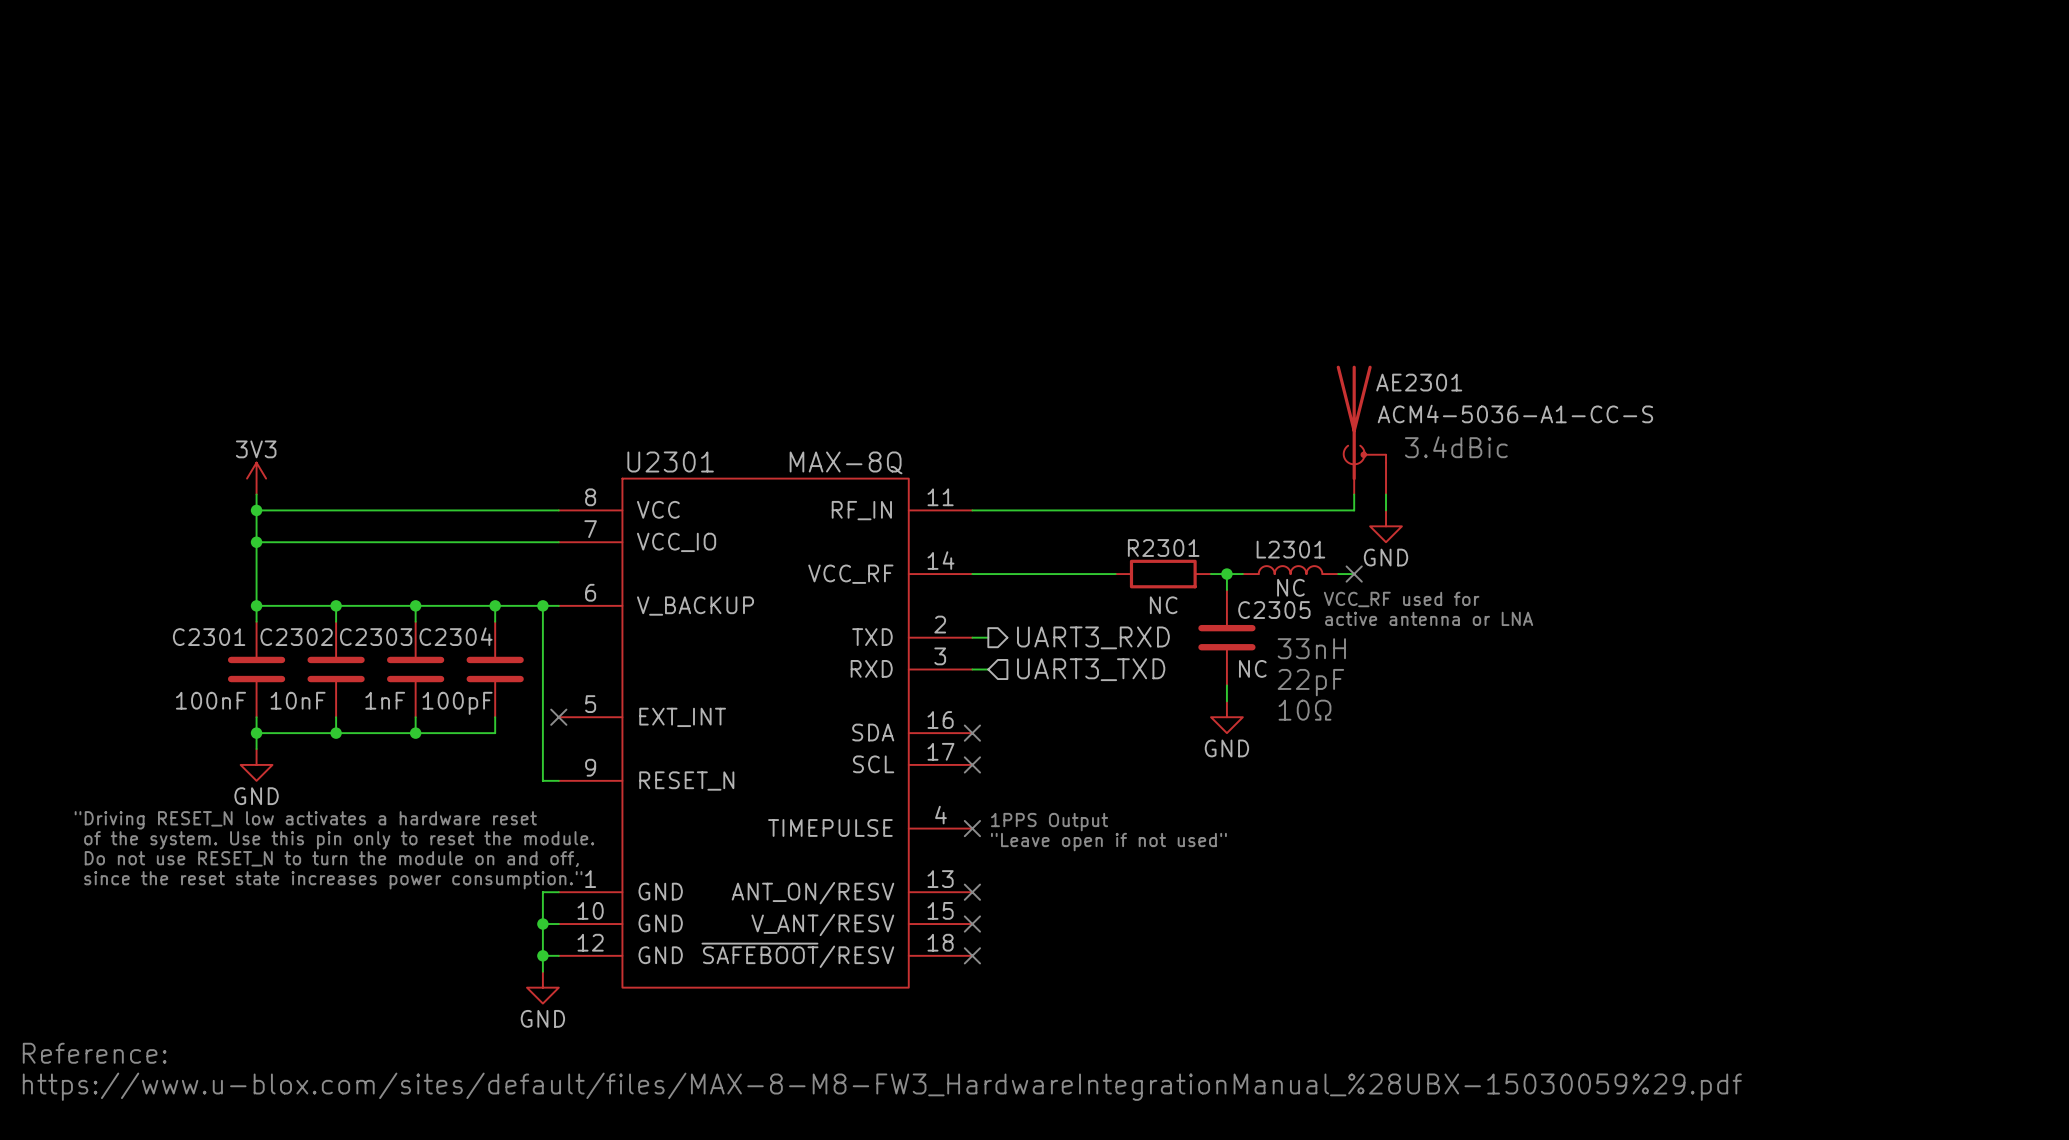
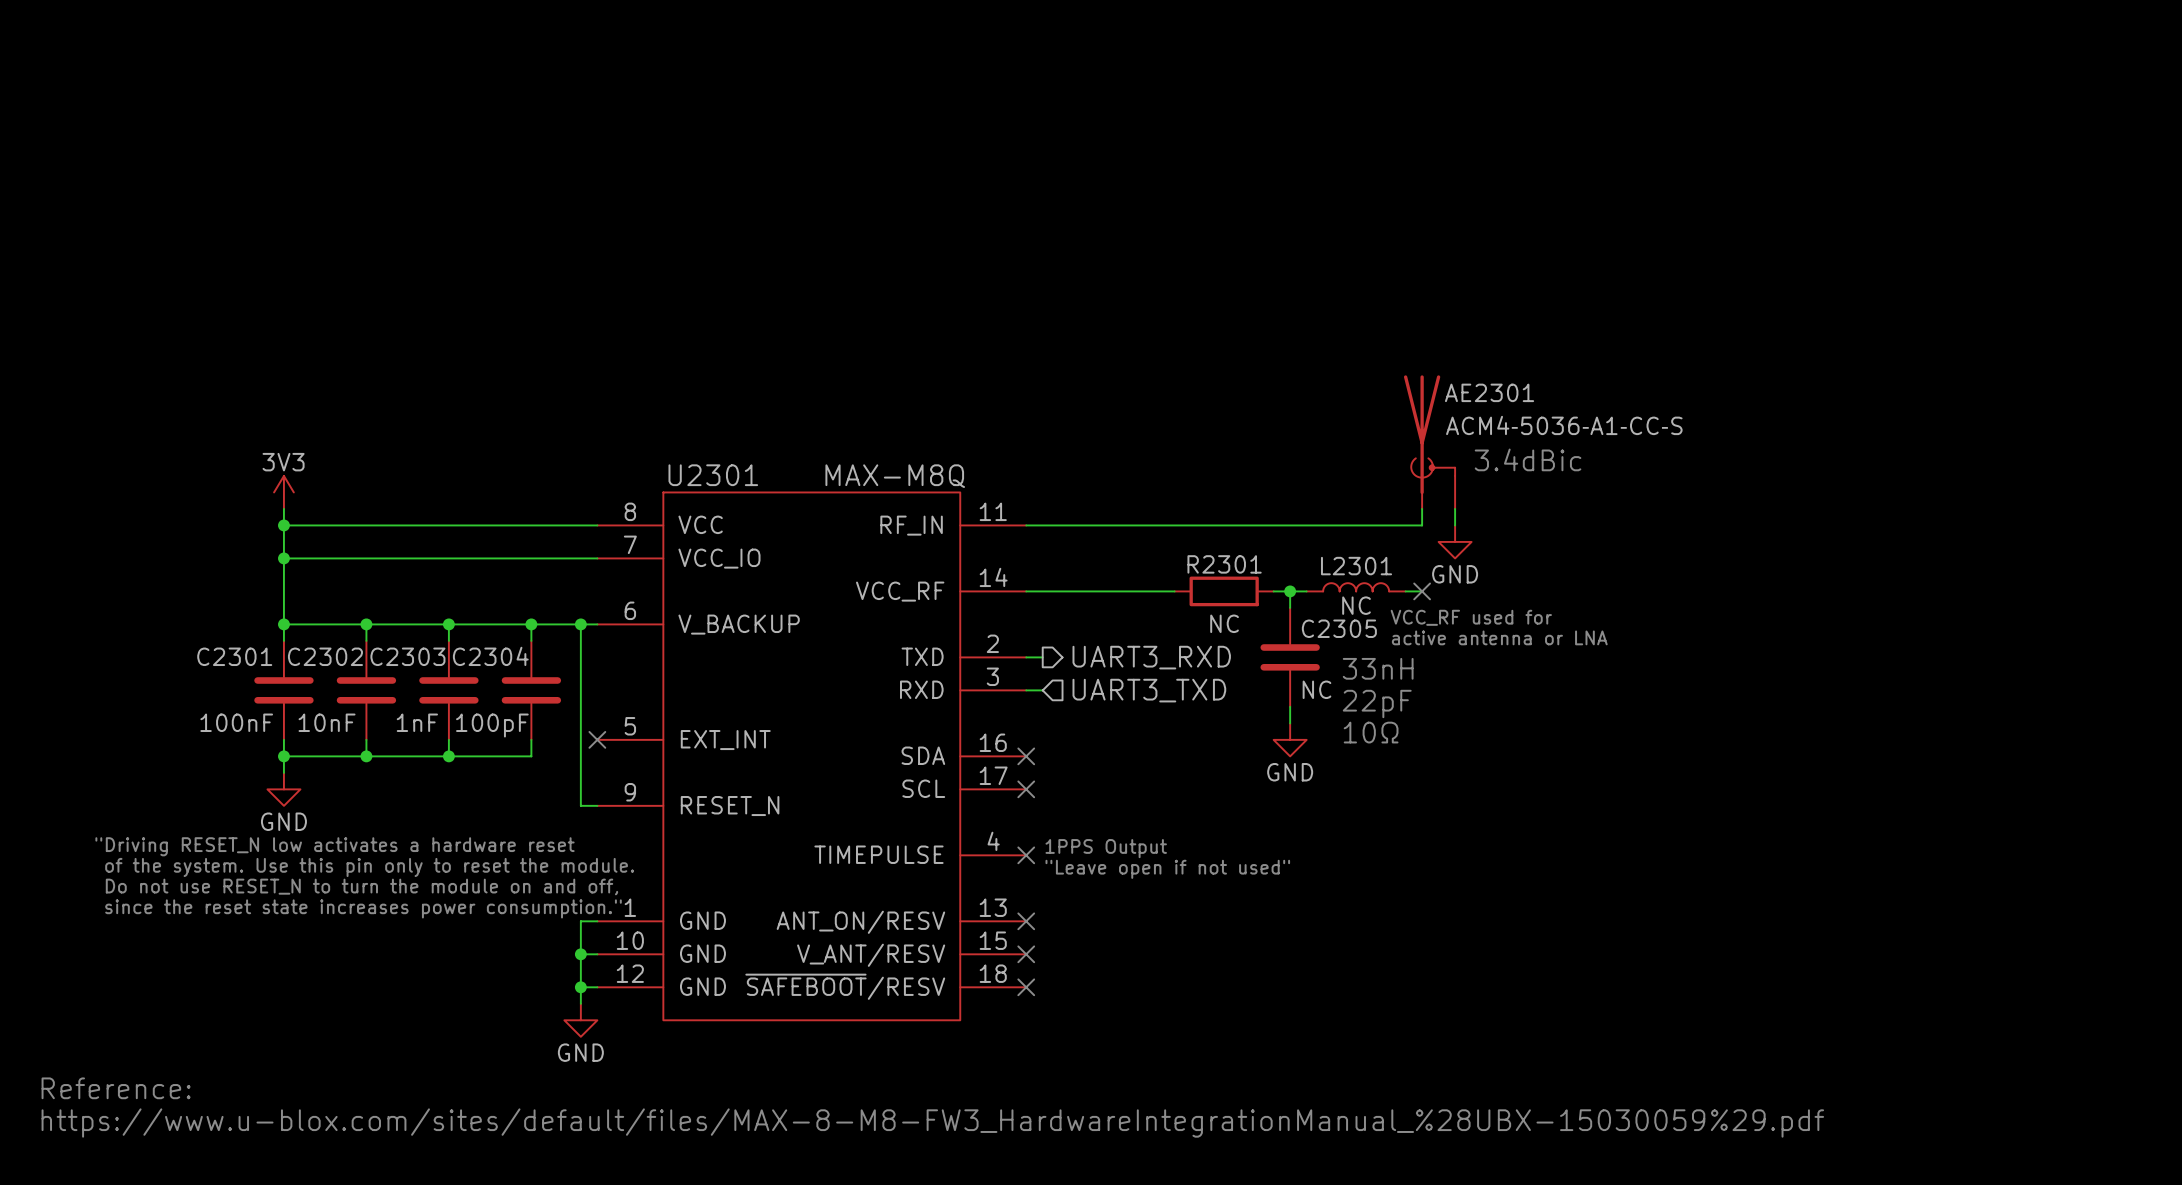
AE2301 value: ACM4-5036-A1-CC-S (1515, 414) -> ACM4‐5036‐A1‐CC‐S (1564, 425)
U2301 value: MAX-8Q (846, 462) -> MAX-M8Q (895, 476)

